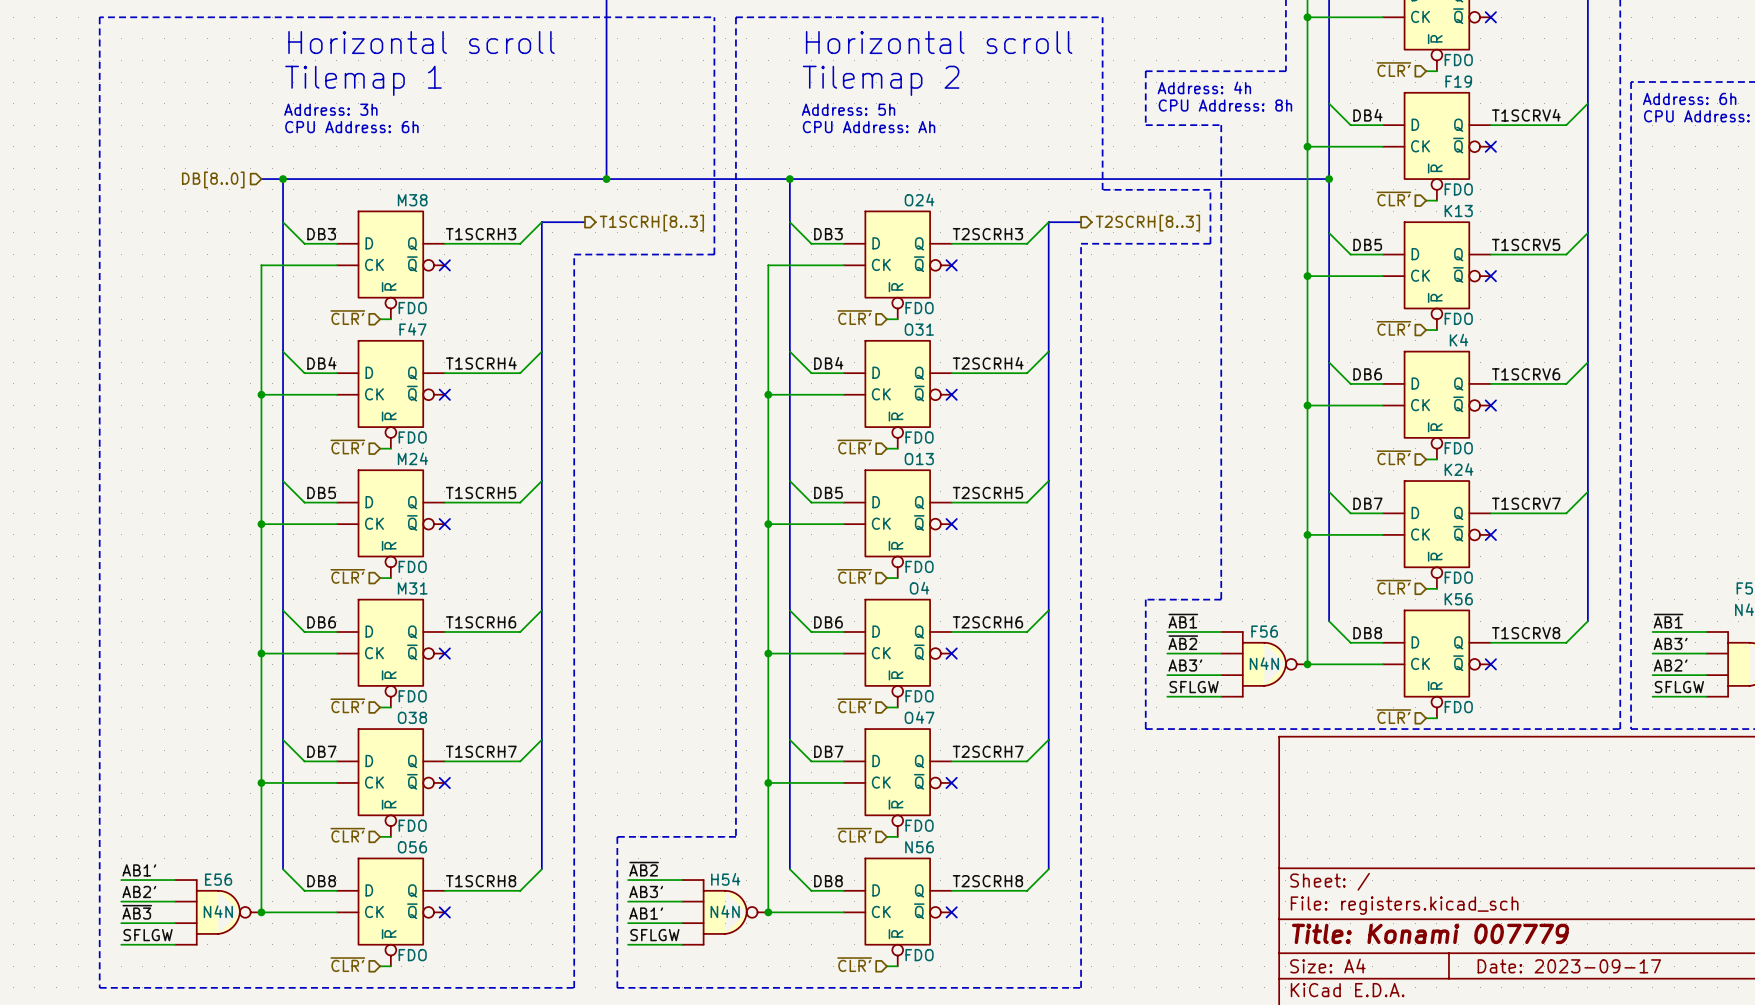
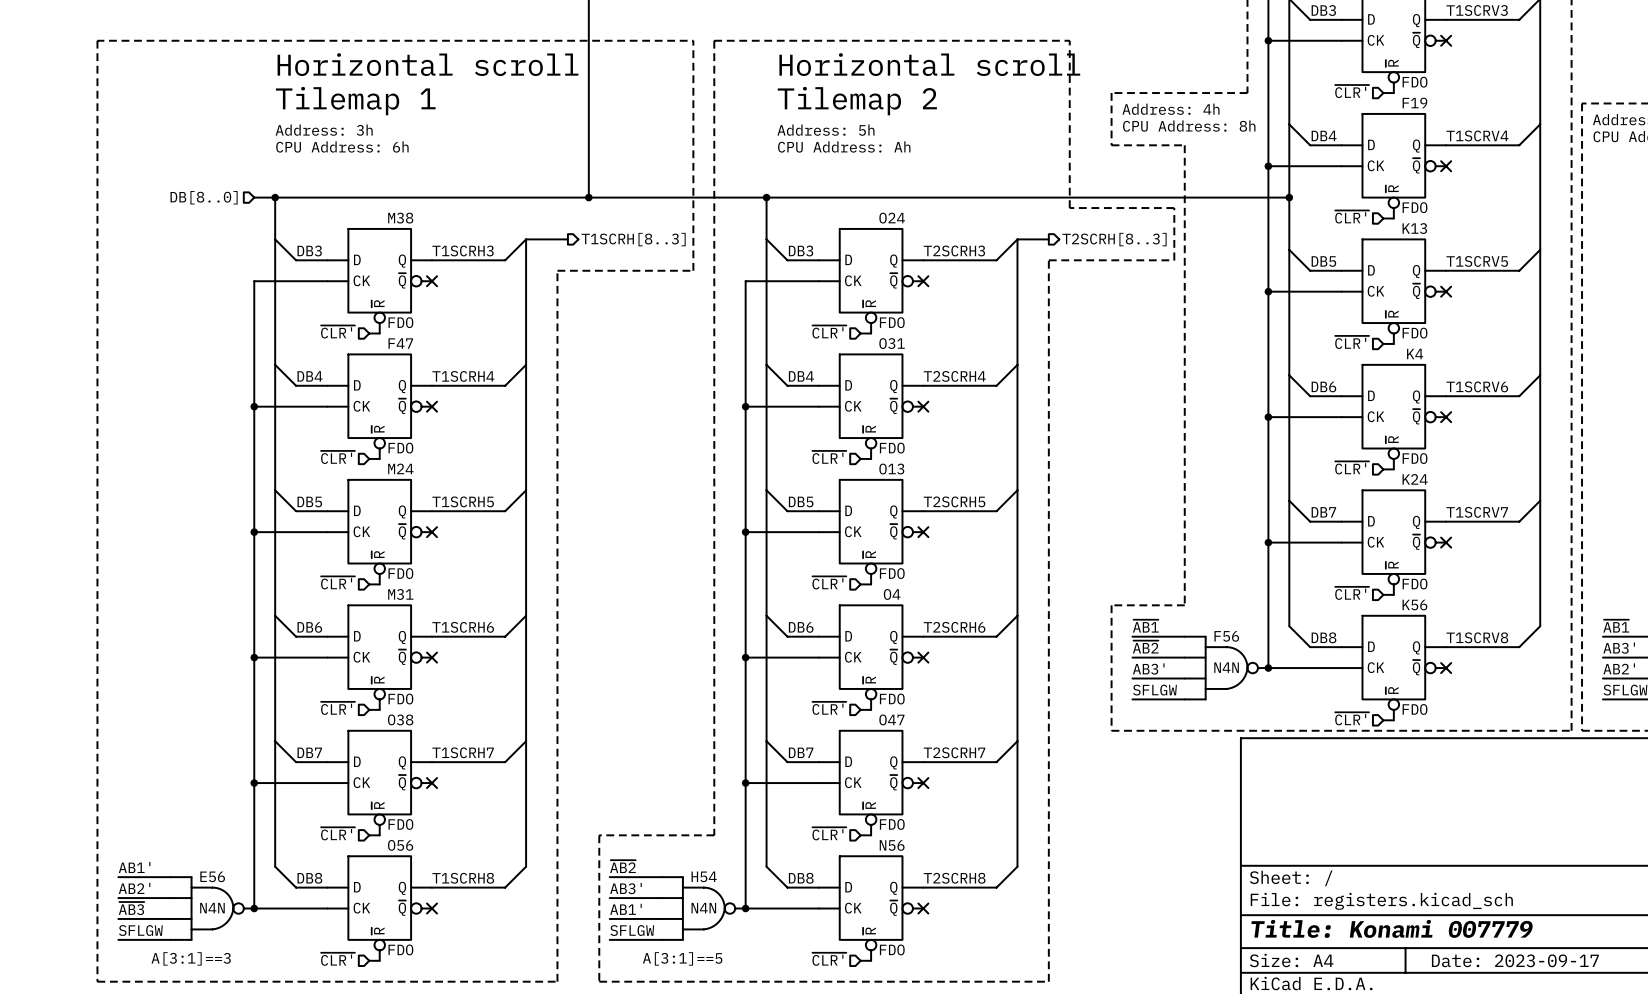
text: none -> A[3:1]==3 (191, 958)
text: none -> A[3:1]==5 (682, 958)

